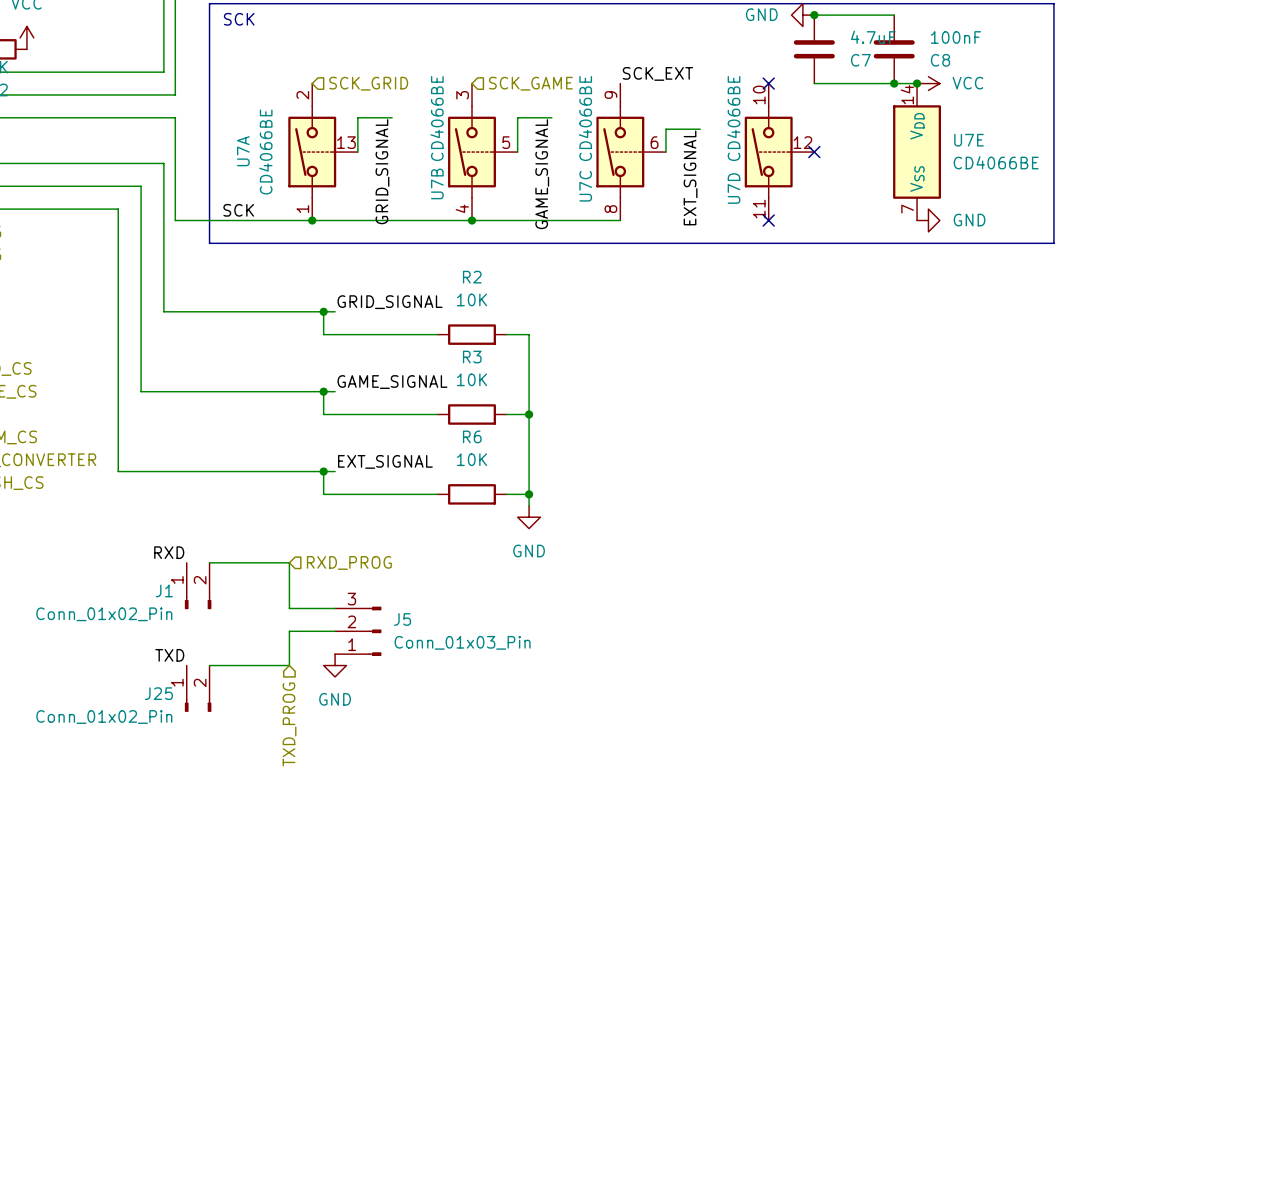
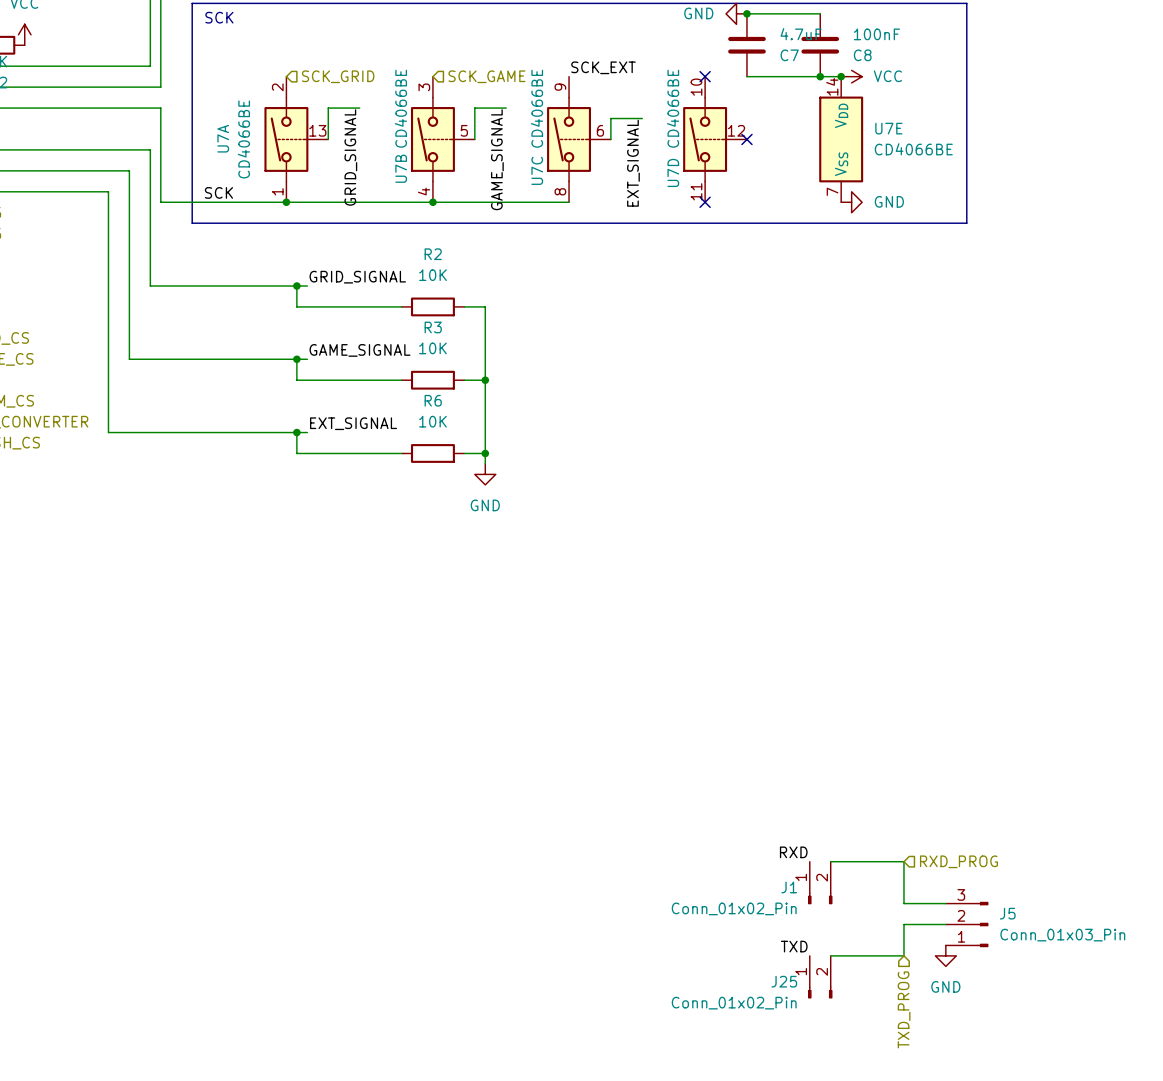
label: RXD (169, 552) -> none
wire: (209, 562) (289, 562) (289, 608) (335, 608) -> none
hierarchical label: RXD_PROG (349, 562) -> none
J1 position: (198, 586) -> (820, 882)
wire: (335, 631) (289, 631) (289, 665) (209, 665) -> none
J5 position: (358, 631) -> (967, 924)
label: TXD (169, 655) -> none
power symbol: GND (335, 665) -> none
J25 position: (198, 688) -> (820, 977)
hierarchical label: TXD_PROG (289, 724) -> none
label: none -> RXD (793, 852)
wire: none -> (830, 861) (903, 861) (903, 903) (945, 903)
hierarchical label: none -> RXD_PROG (958, 861)
wire: none -> (945, 924) (903, 924) (903, 955) (830, 955)
label: none -> TXD (794, 946)
power symbol: none -> GND (945, 955)
hierarchical label: none -> TXD_PROG (904, 1009)

